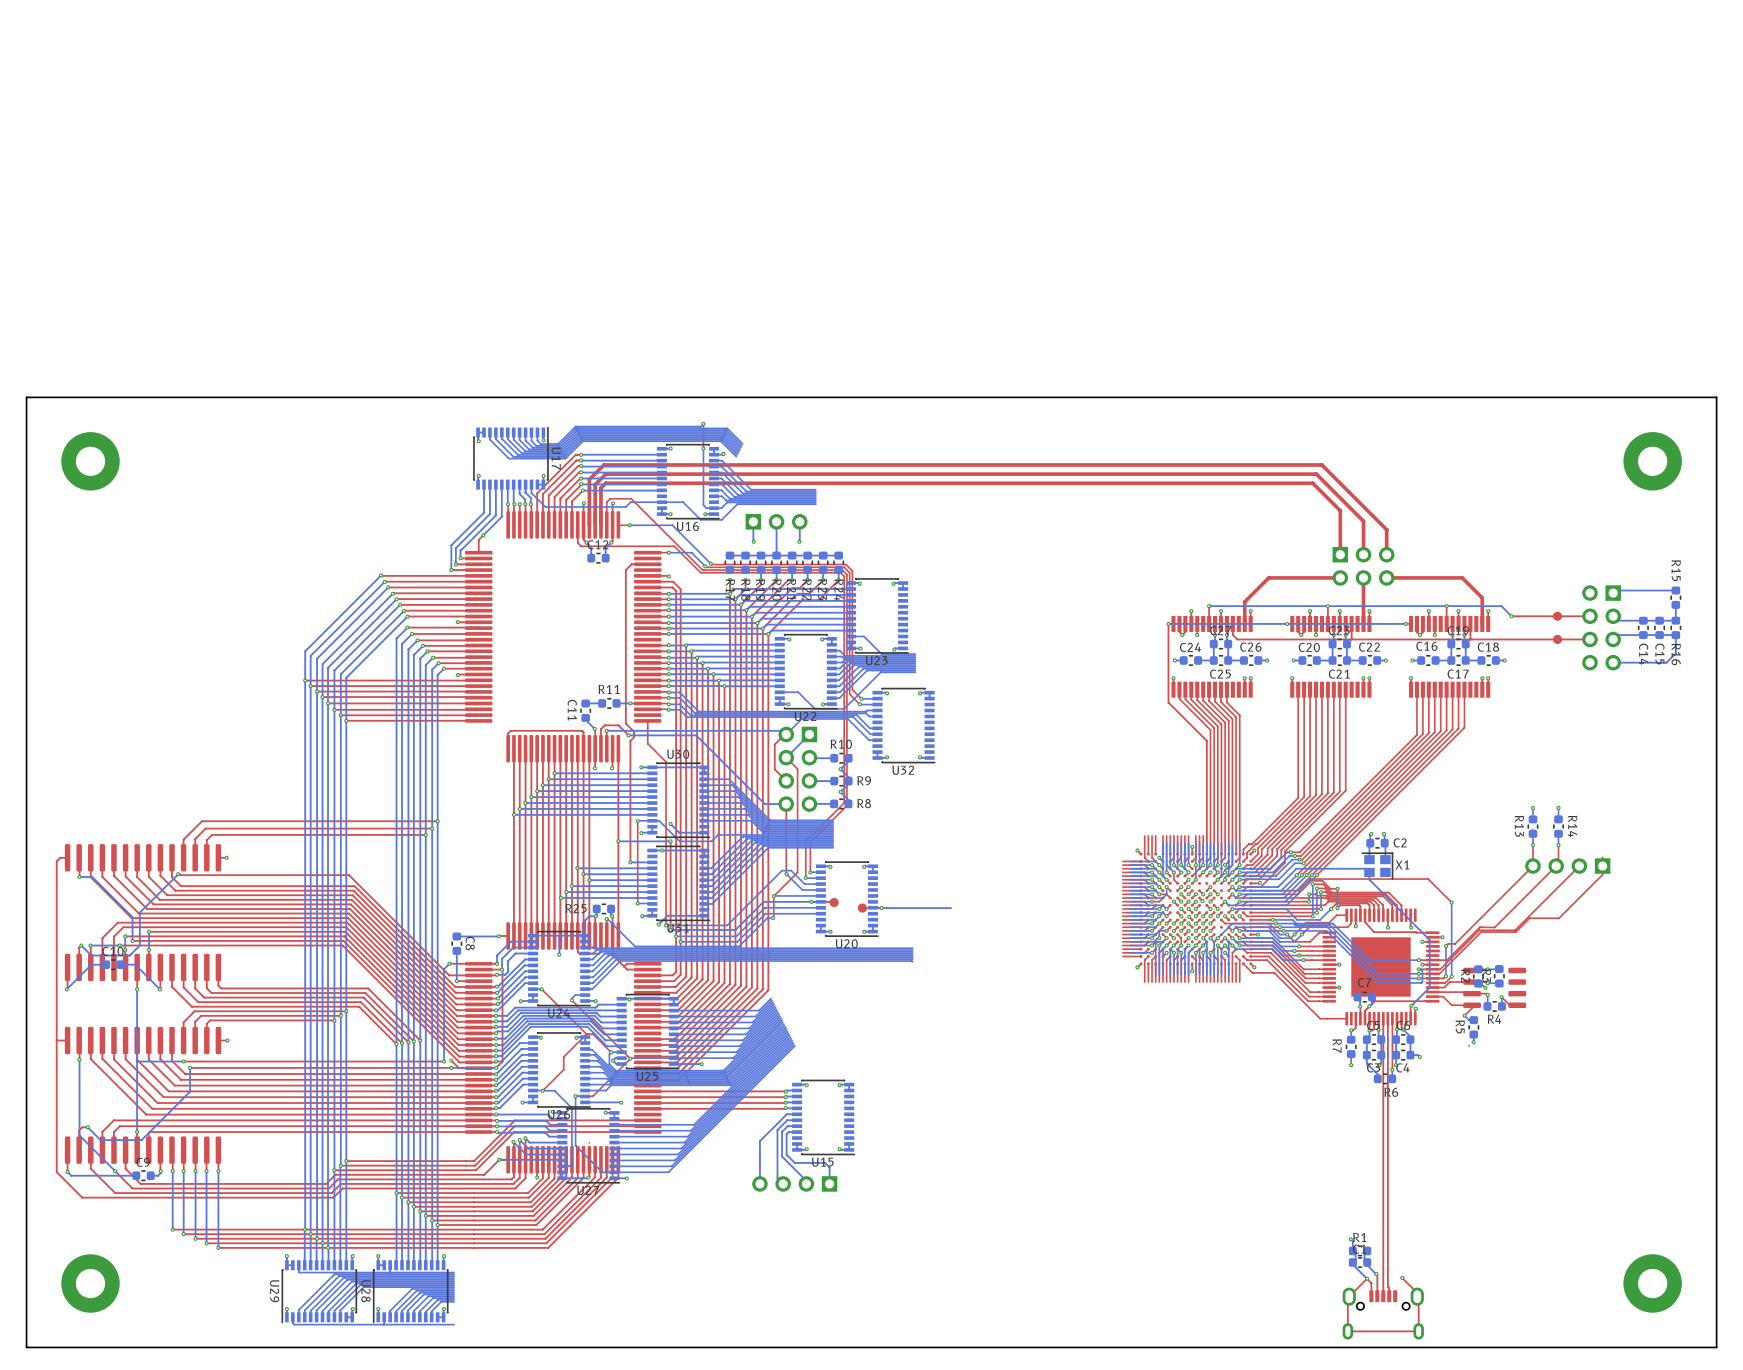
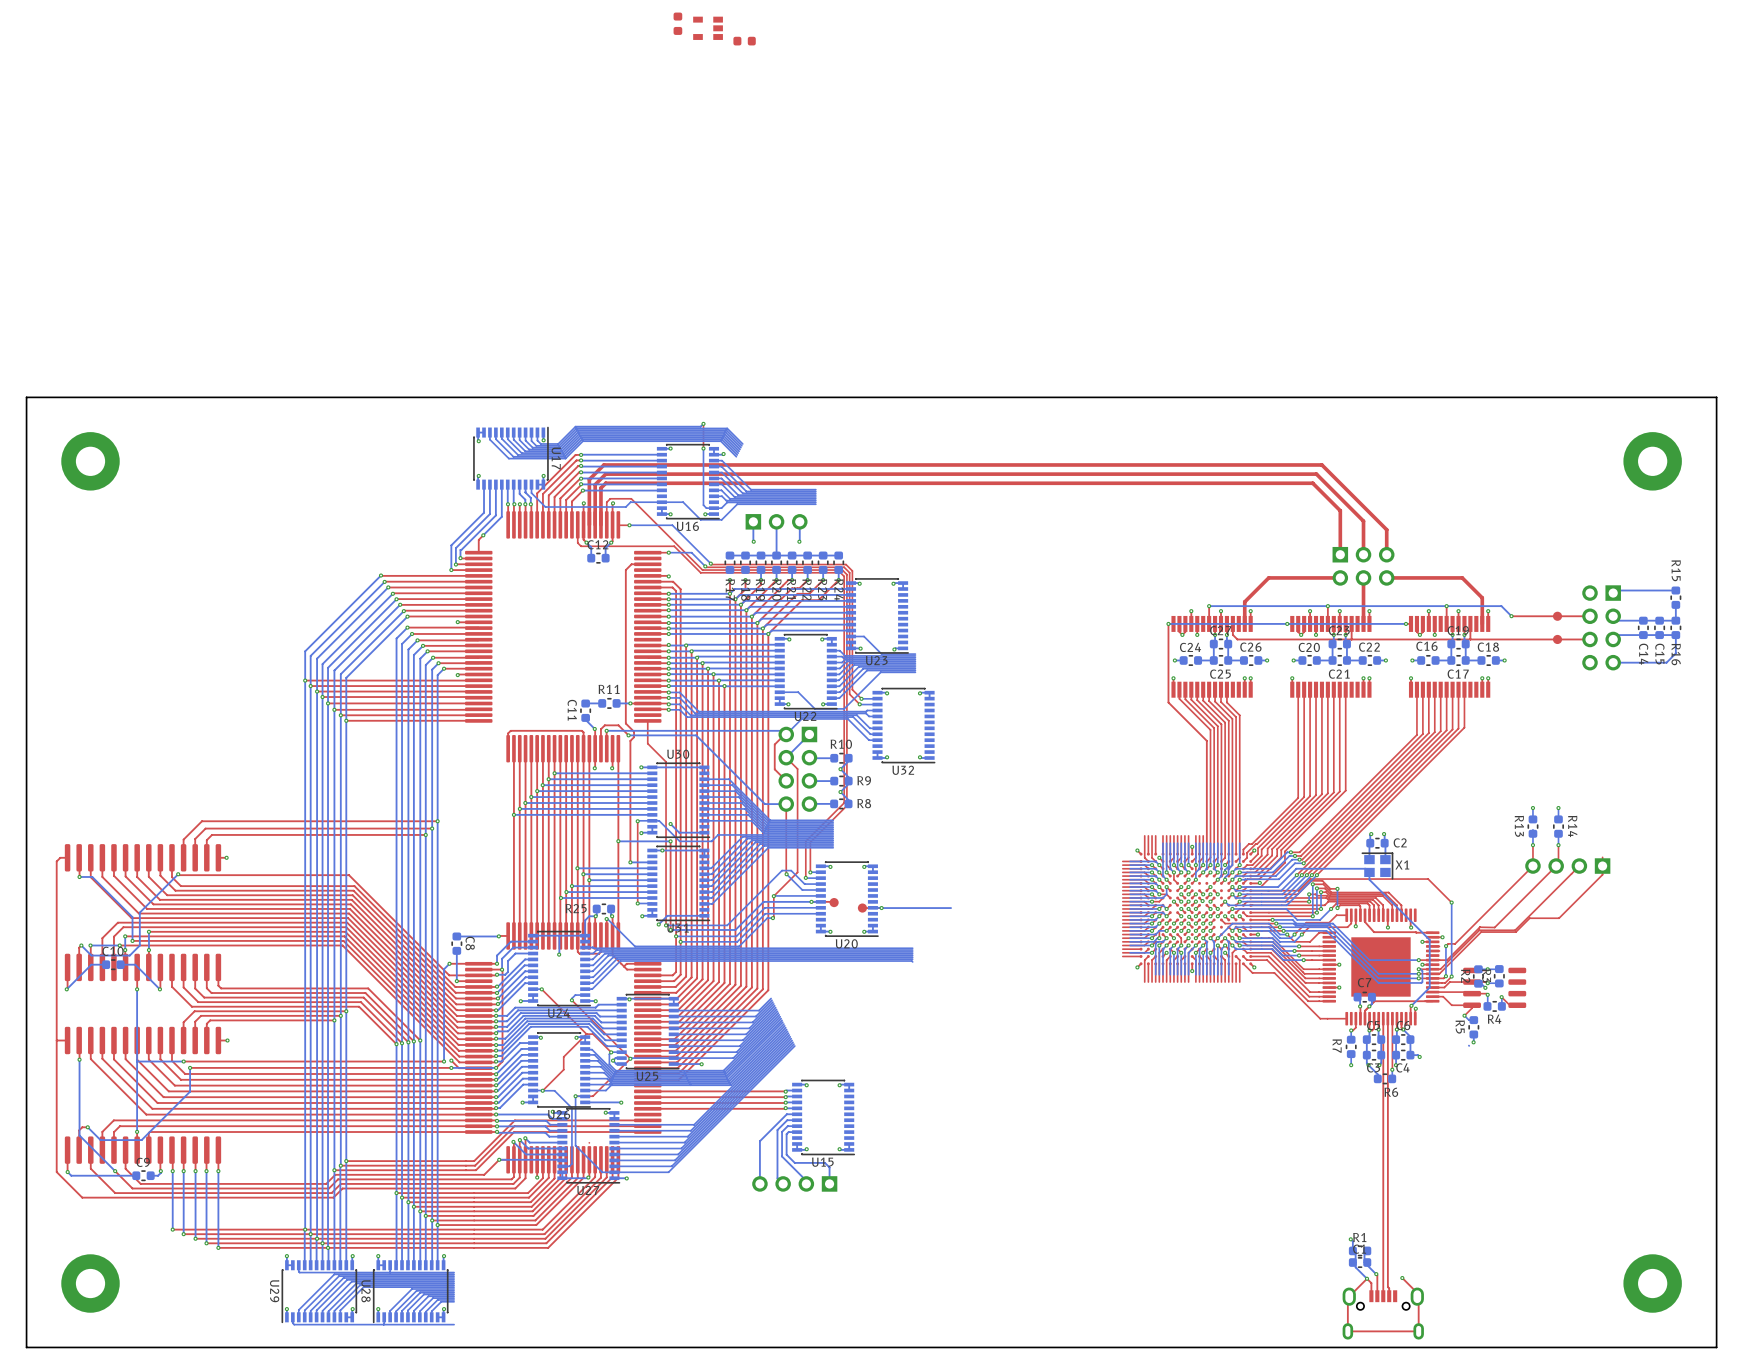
part: none -> (677, 23)
part: none -> (708, 28)
part: none -> (744, 41)

